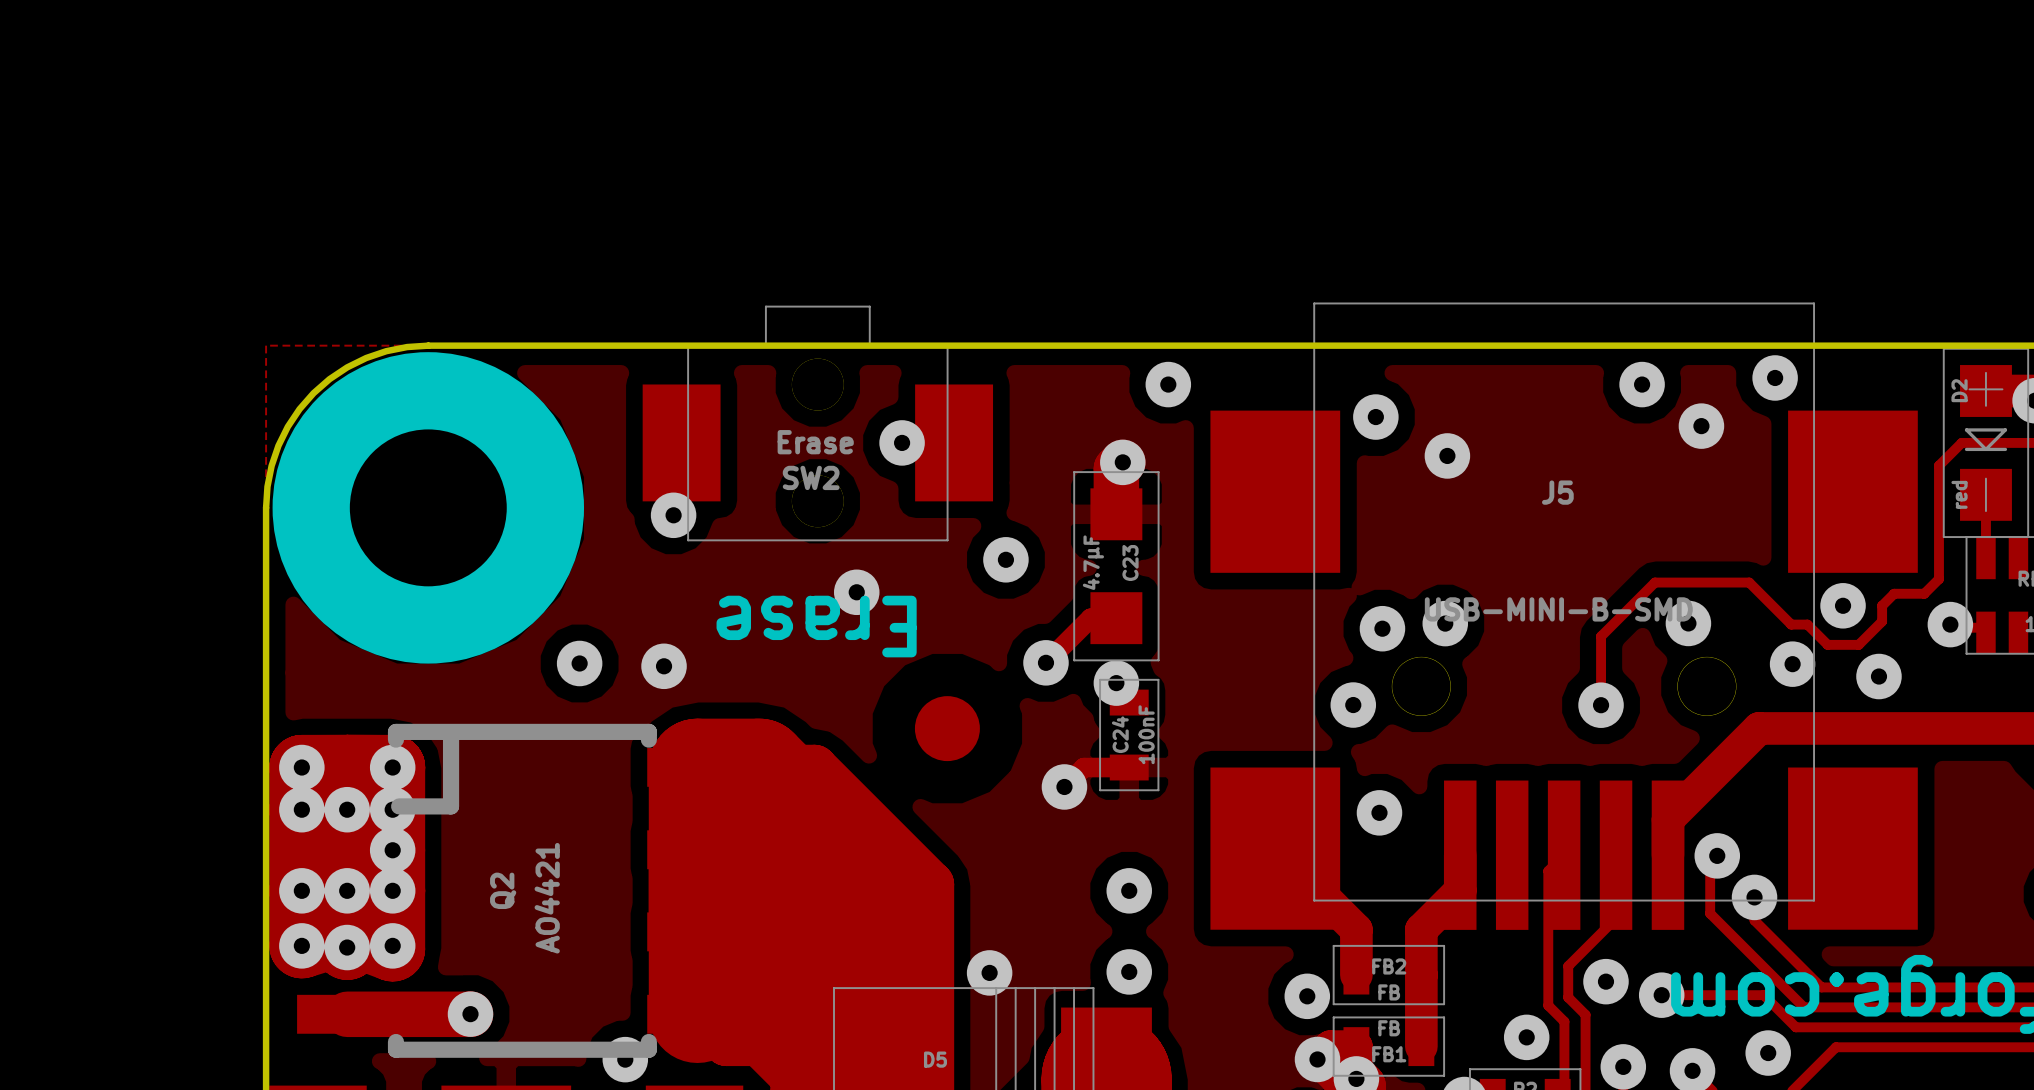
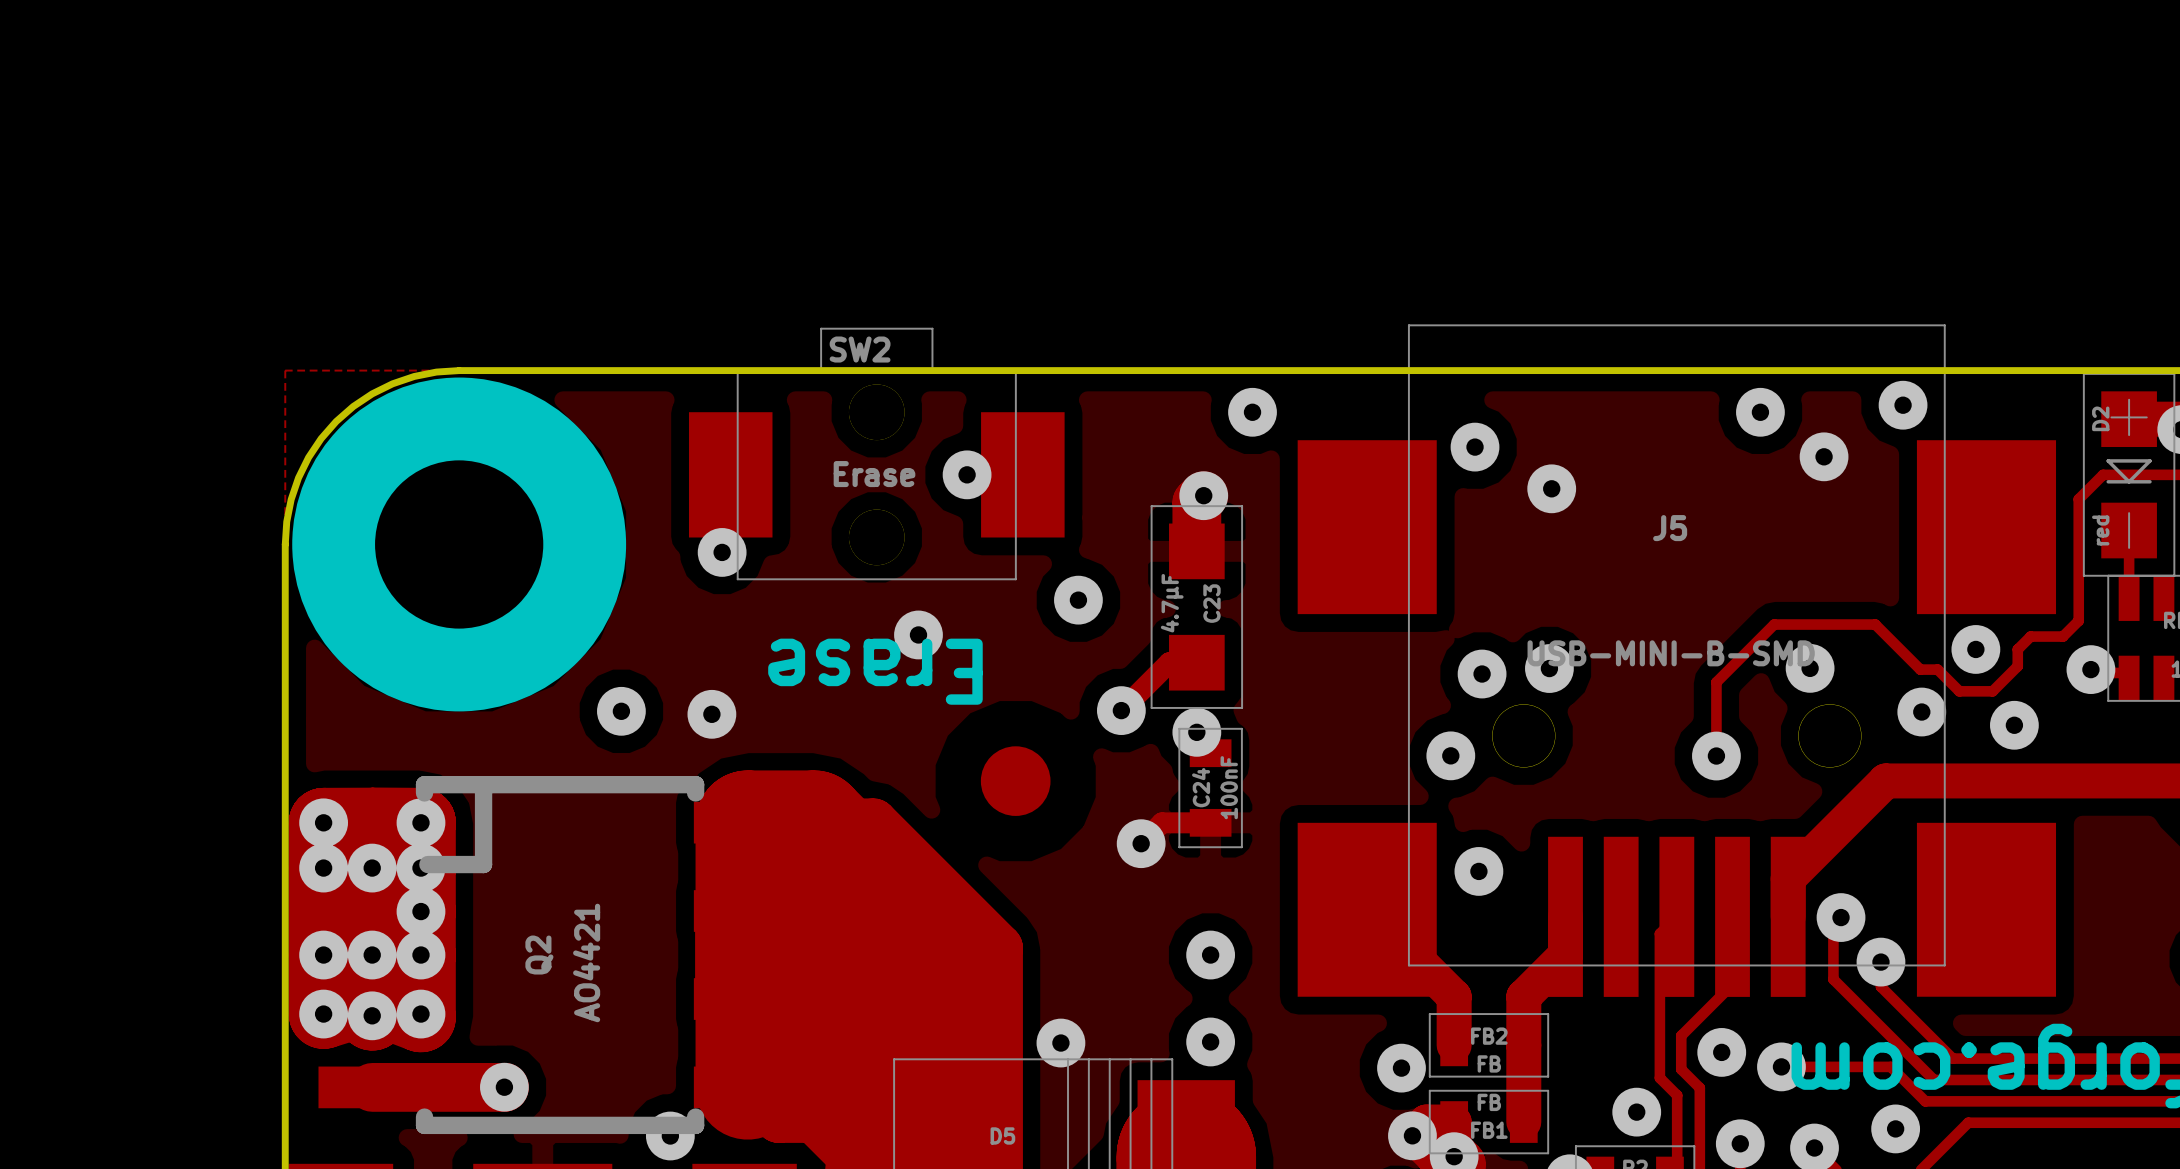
SW2 name position: SW2 (811, 477) -> SW2 (860, 349)

